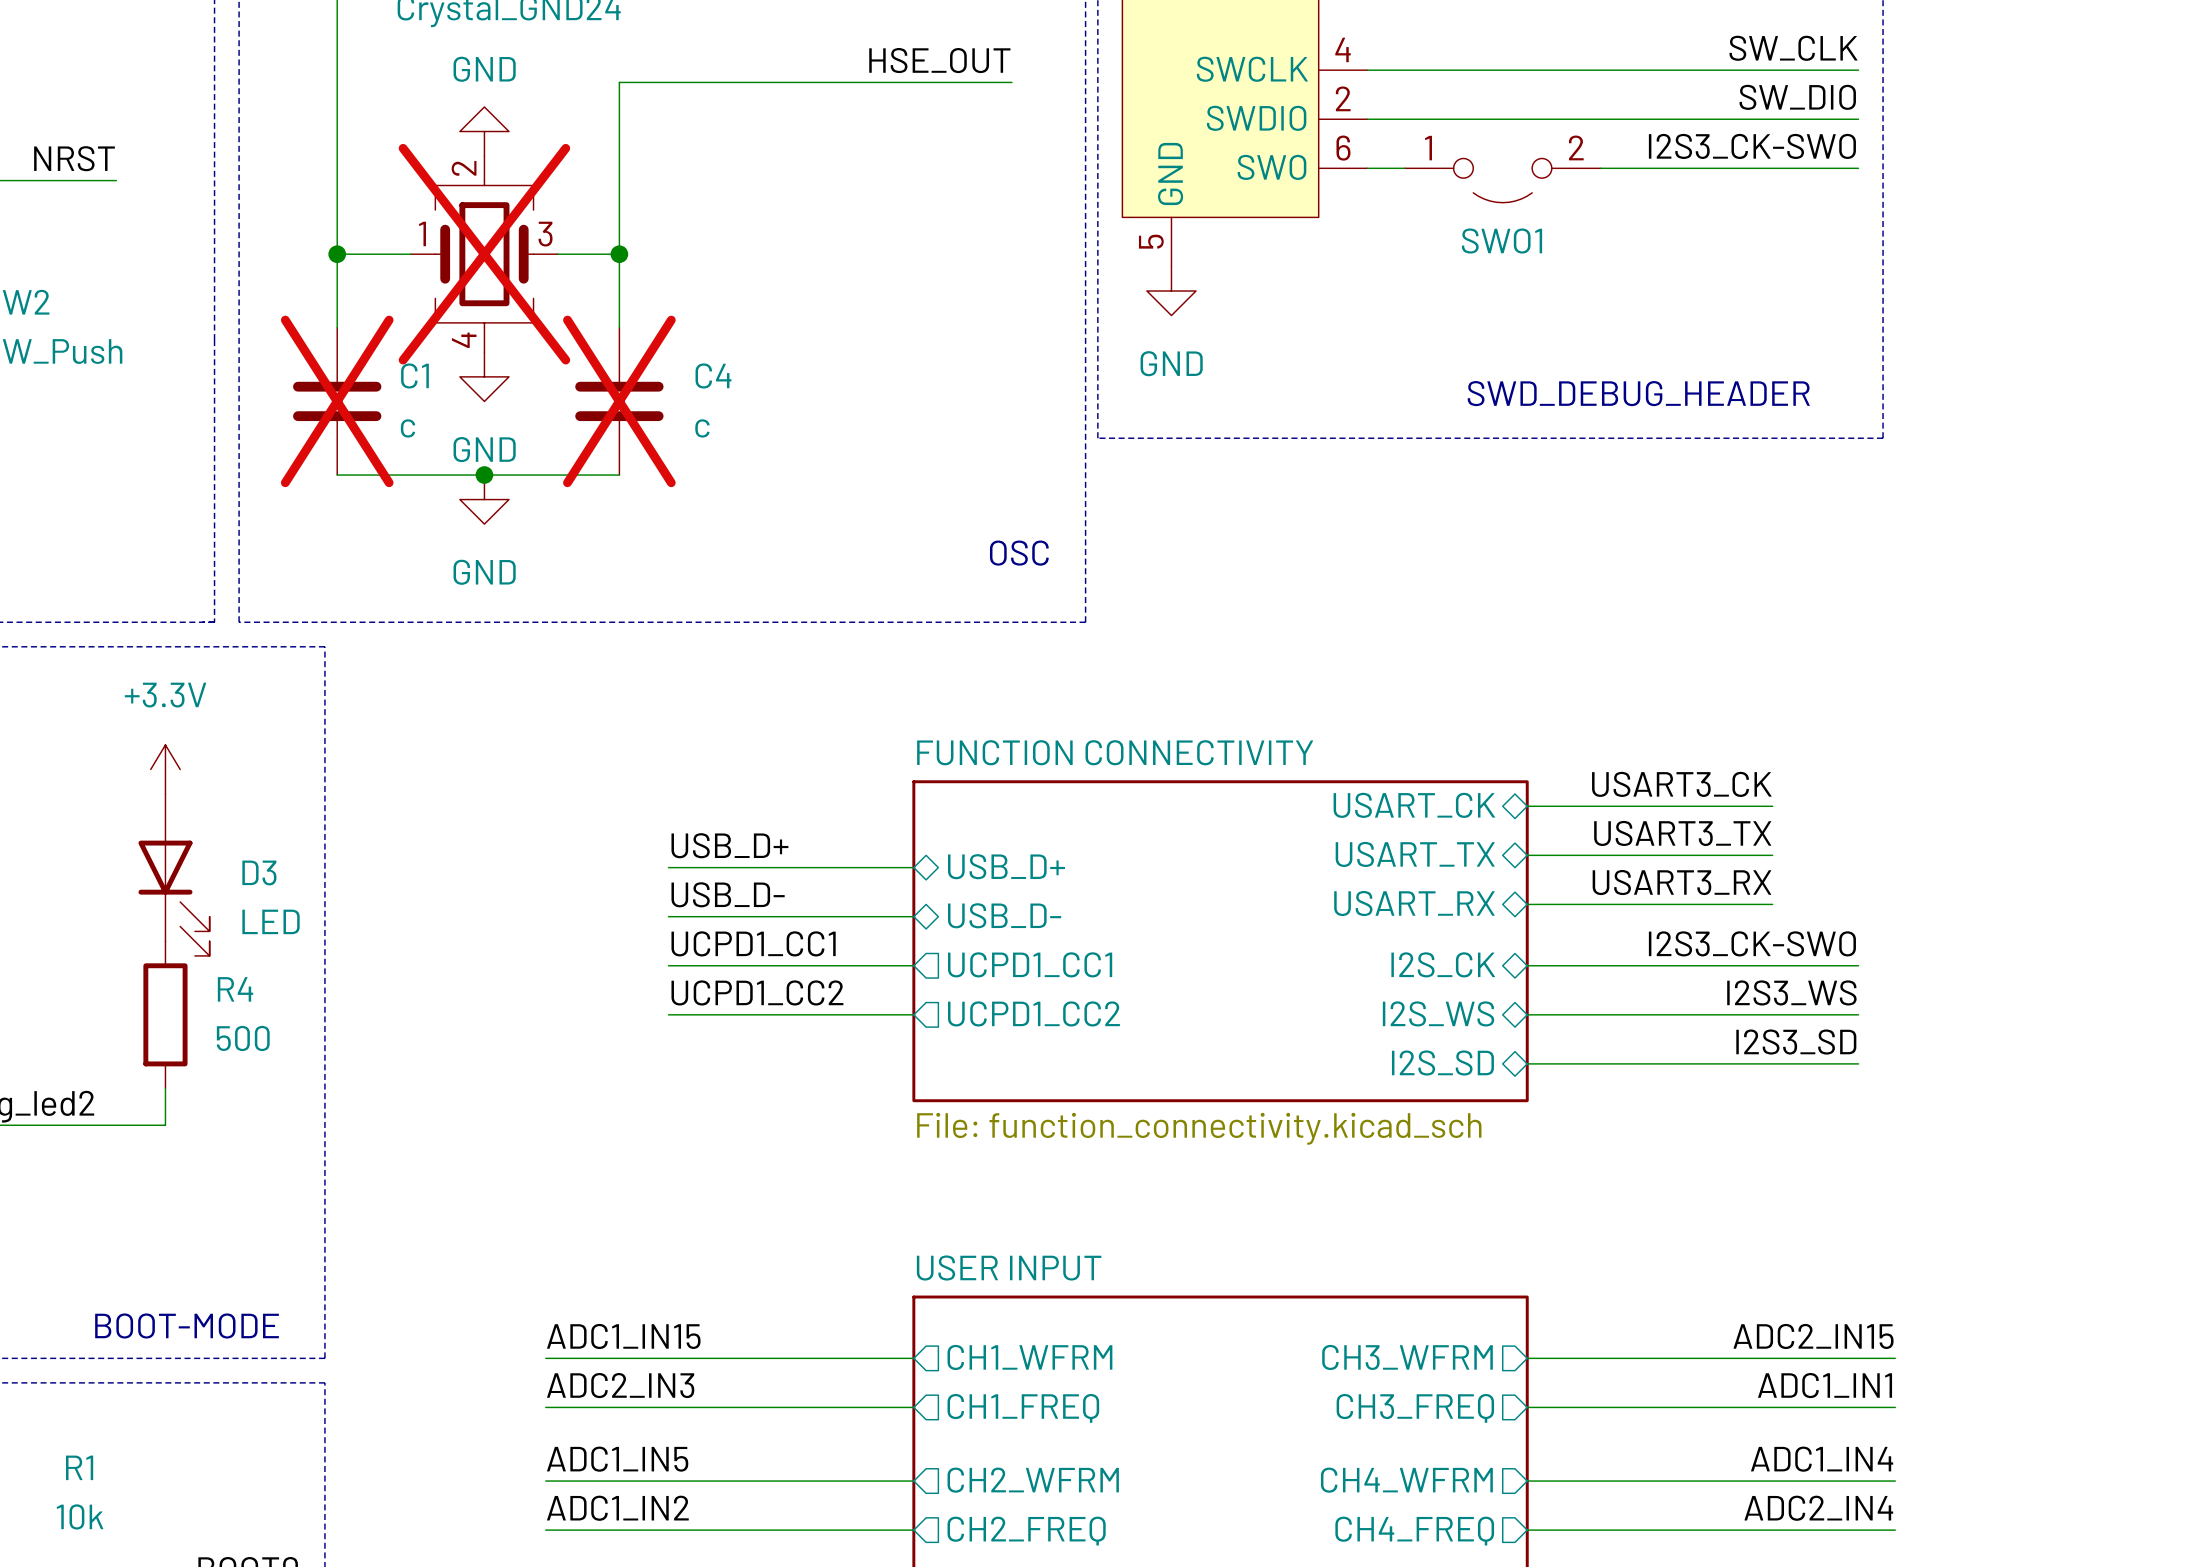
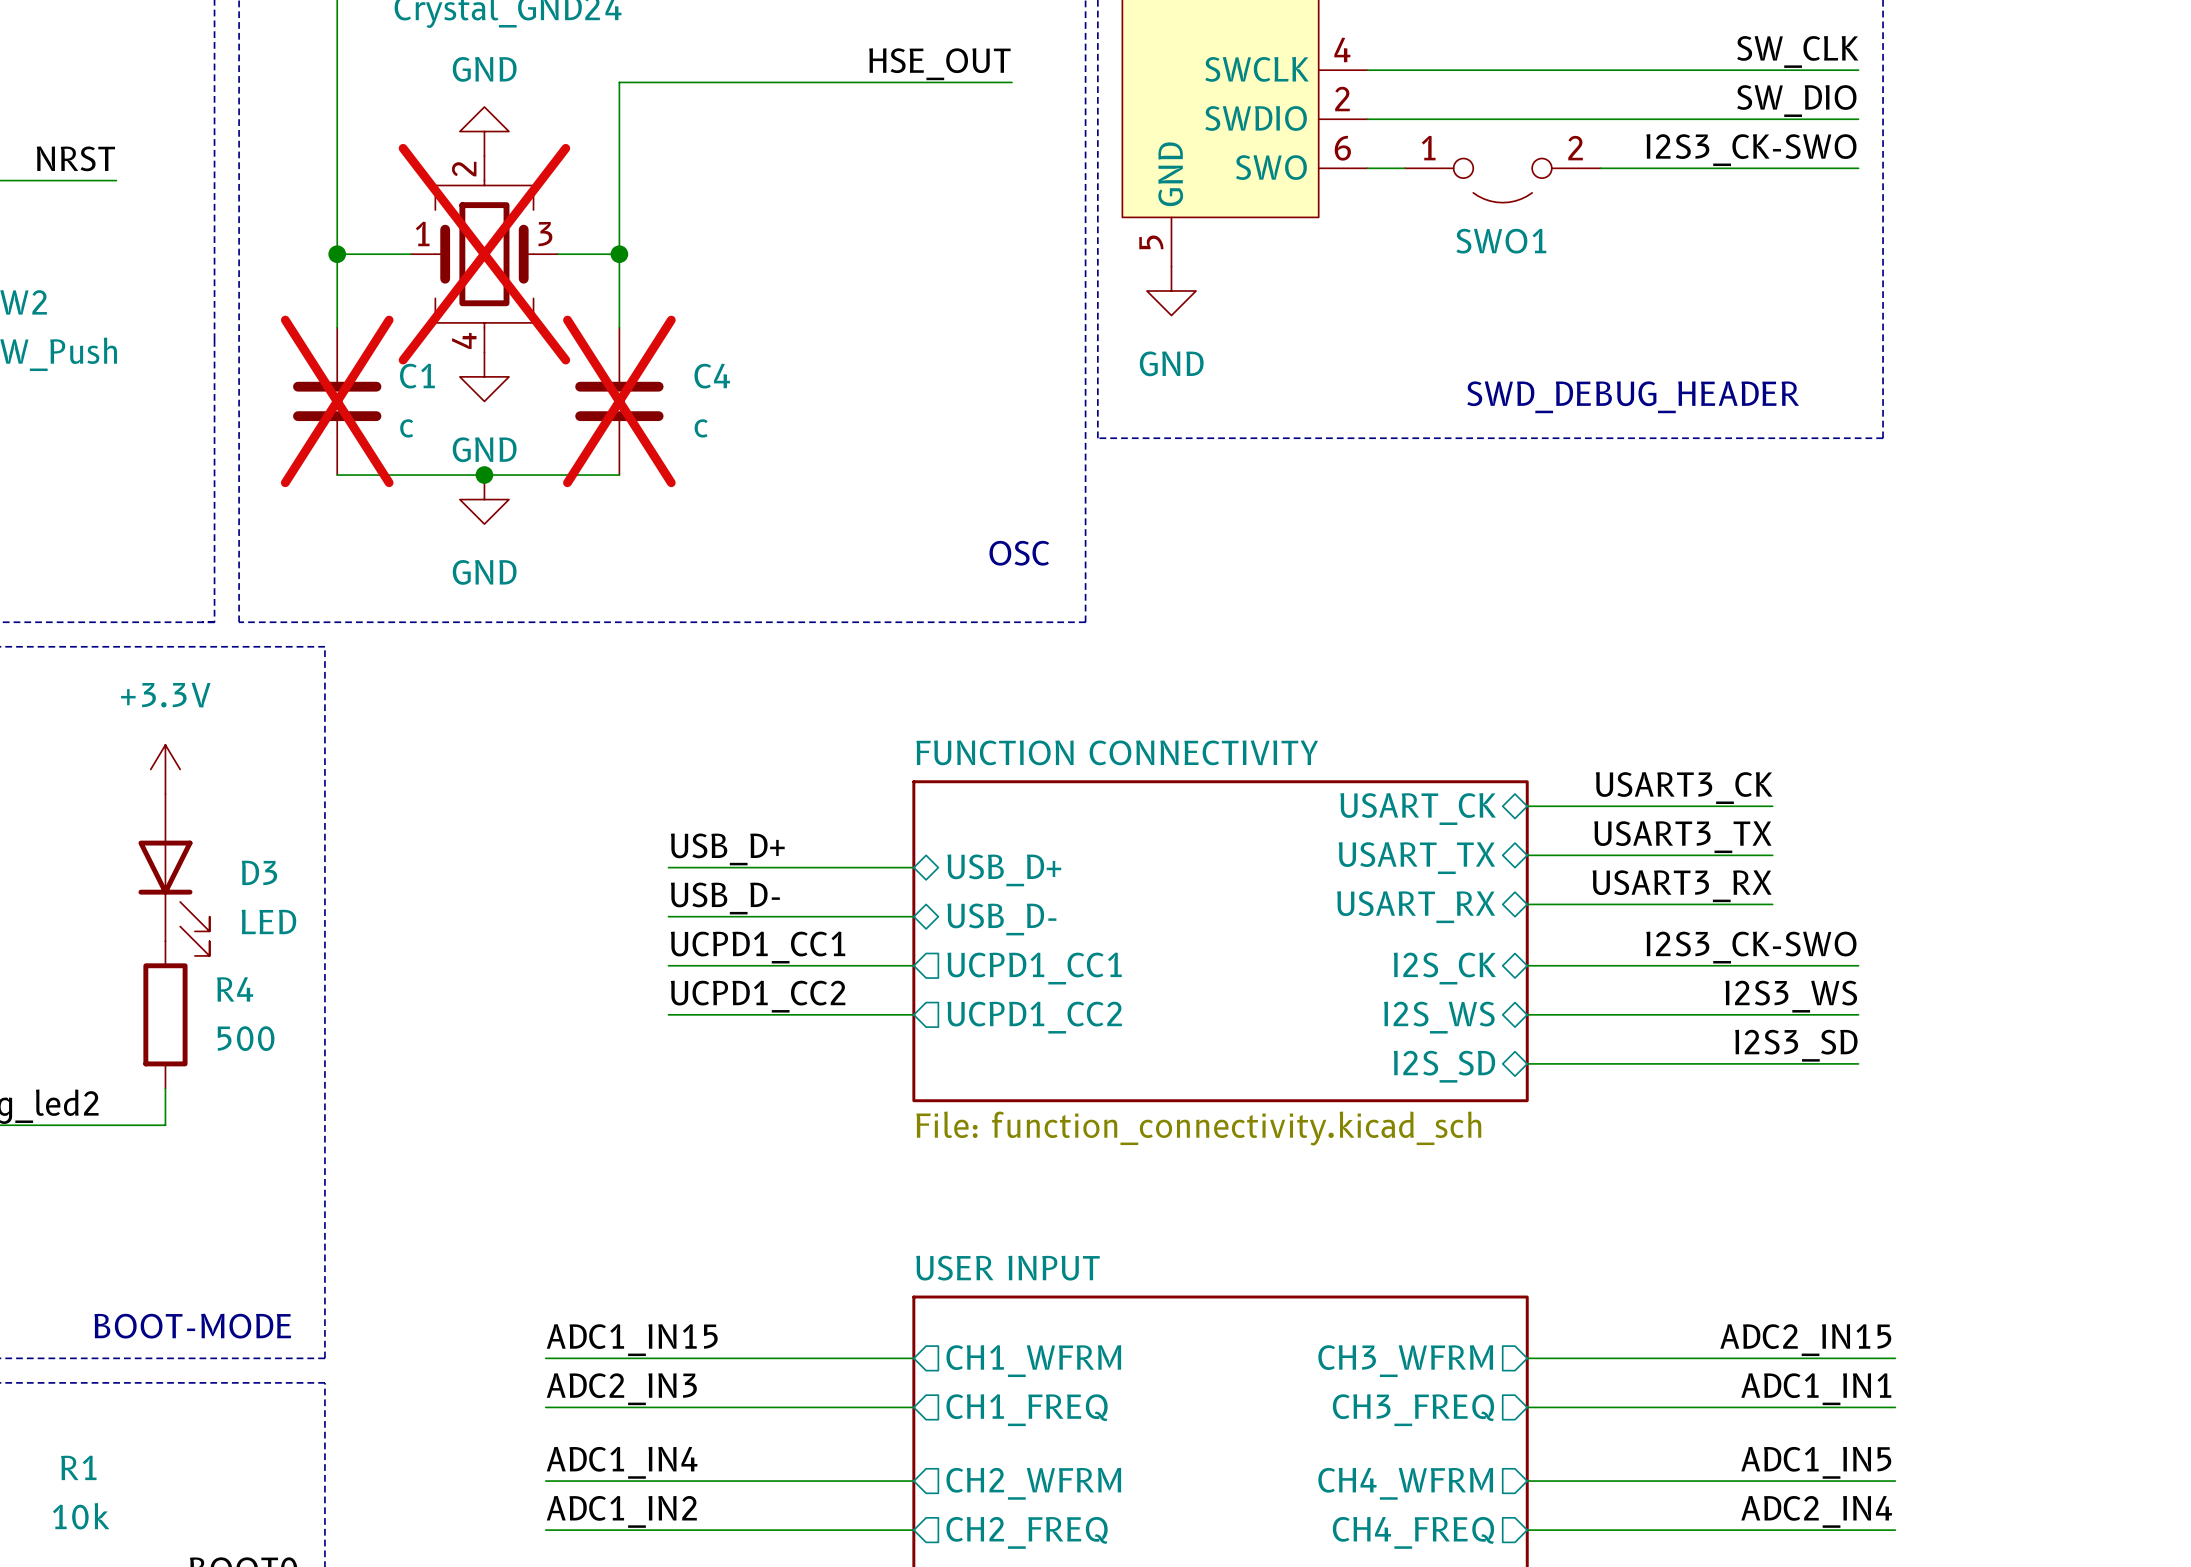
label: ADC1_IN5 (617, 1459) -> ADC1_IN4 (622, 1462)
label: ADC1_IN4 (1822, 1459) -> ADC1_IN5 (1816, 1462)

